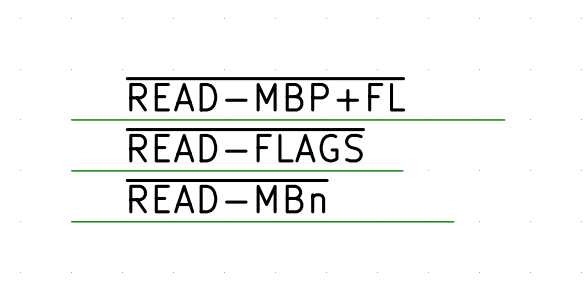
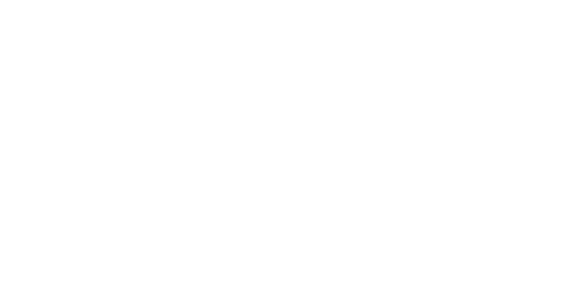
label: ~{READ-MBP+FL} (265, 94) -> none
wire: (71, 119) (504, 119) -> none
label: ~{READ-FLAGS} (245, 145) -> none
wire: (71, 170) (402, 170) -> none
label: ~{READ-MBn} (227, 196) -> none
wire: (71, 221) (453, 221) -> none

